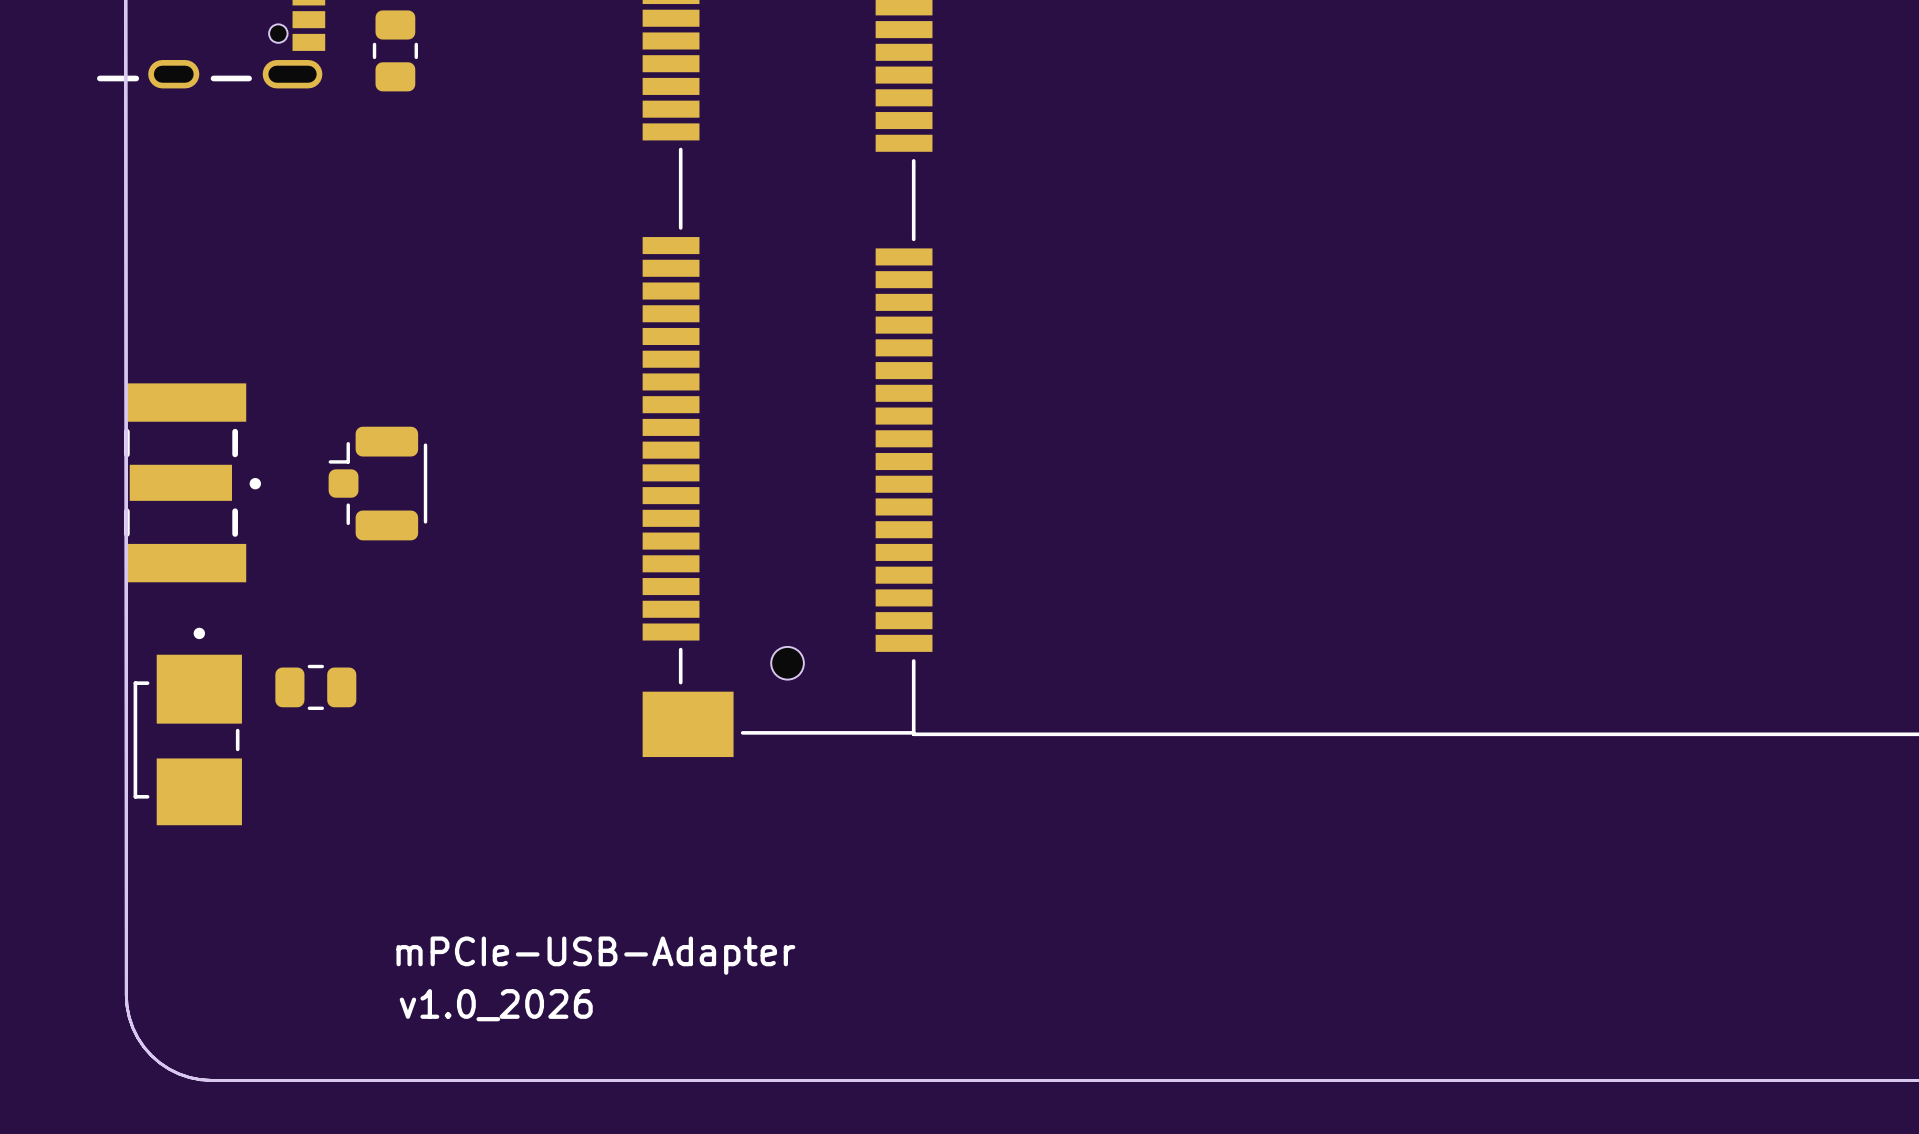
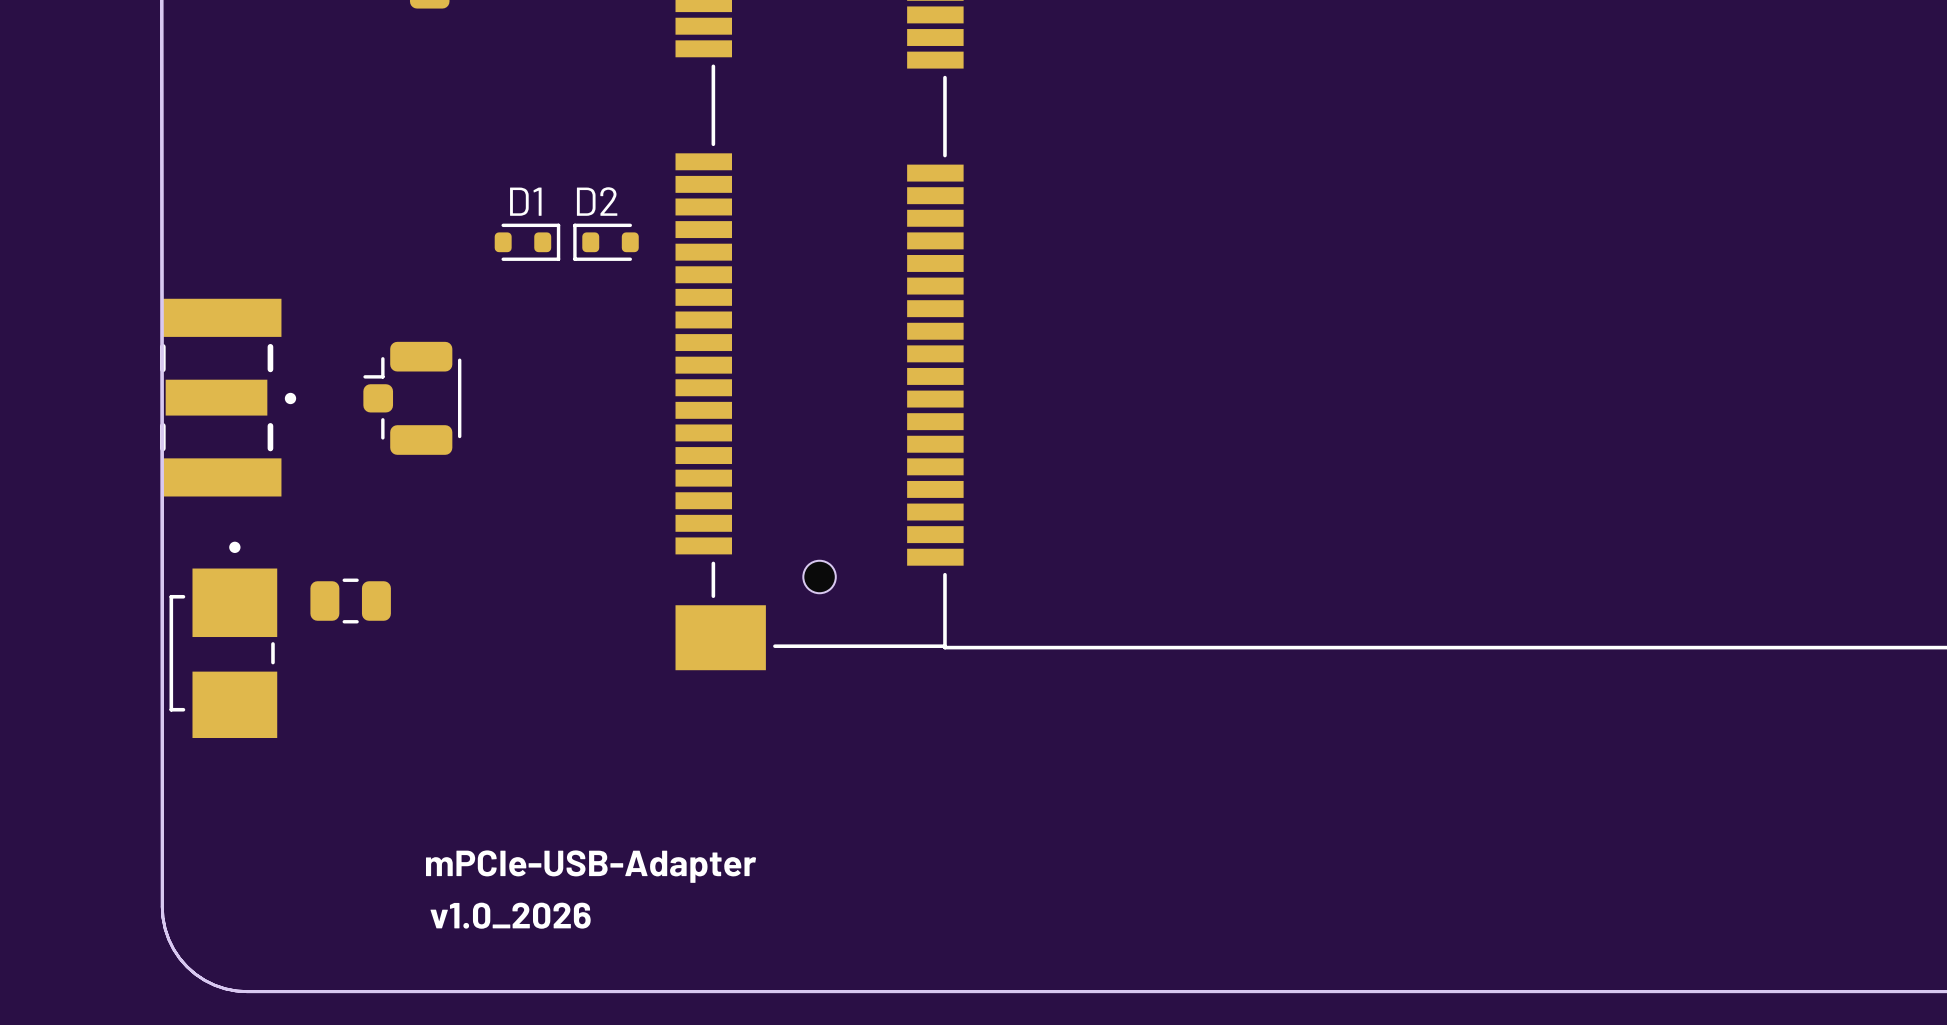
D1: none -> (527, 242)
D2: none -> (606, 242)

